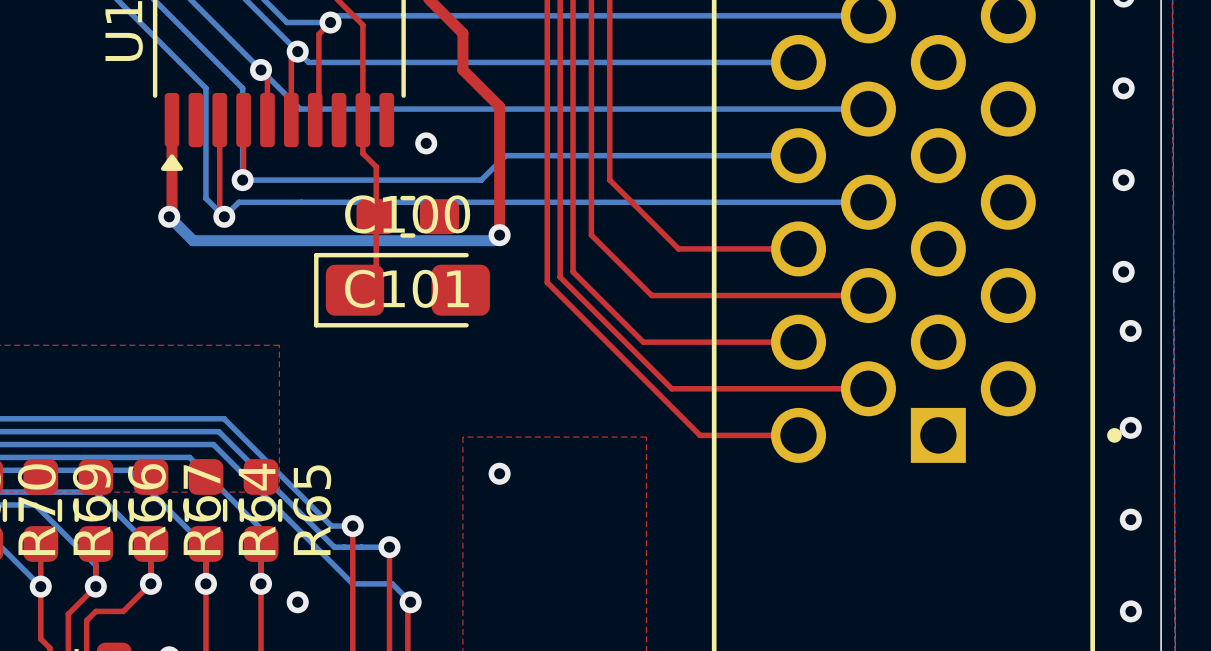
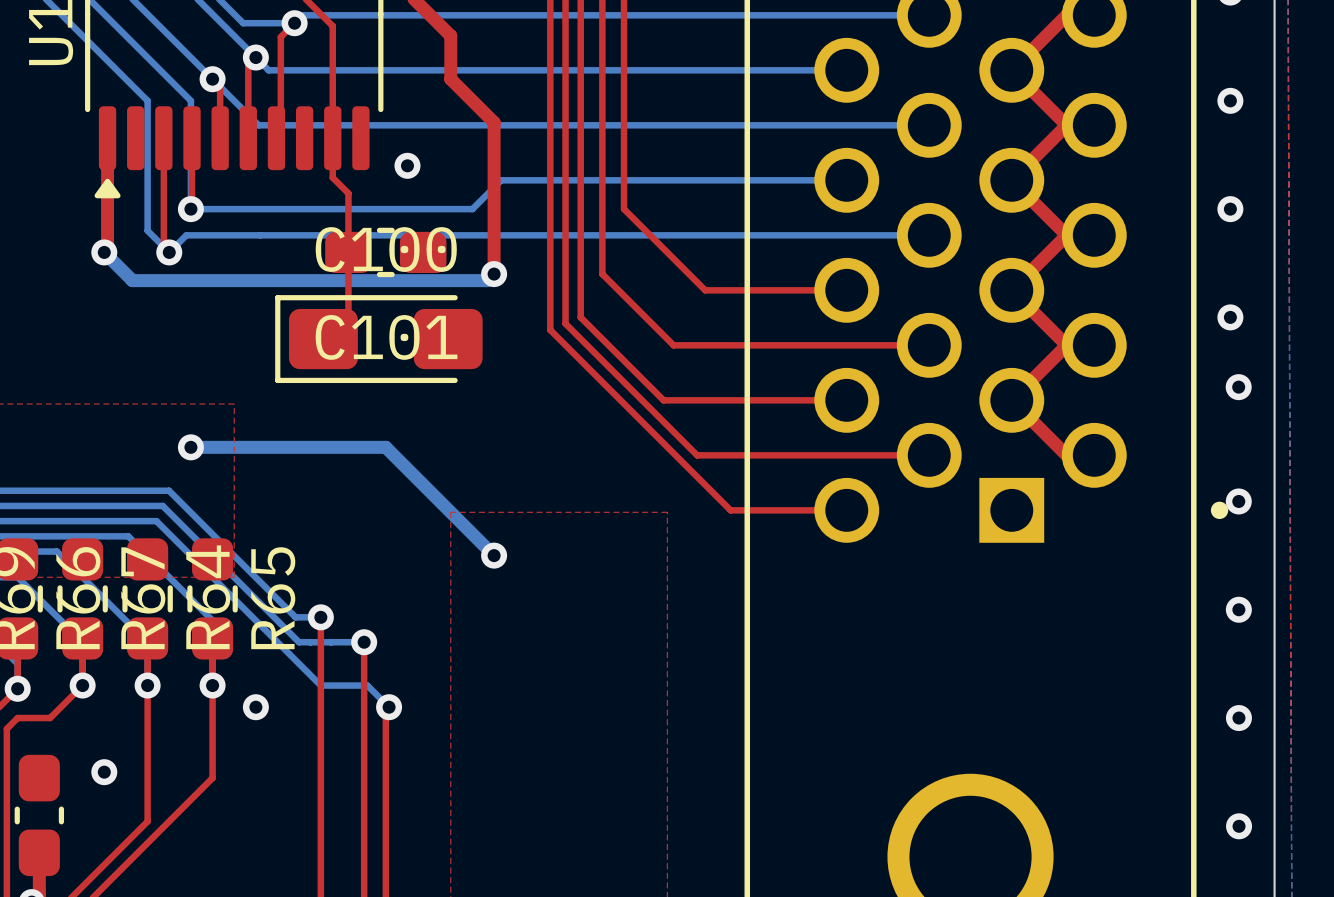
top track: none -> (1094, 15) (1066, 15) (1011, 70) (1066, 125)
top track: none -> (1066, 125) (1011, 180) (1066, 235)
top track: none -> (1066, 235) (1011, 290) (1066, 345)
top track: none -> (1066, 345) (1011, 400) (1066, 455) (1094, 455)
bottom track: none -> (190, 447) (385, 447) (494, 555)
via: none -> (190, 447)

